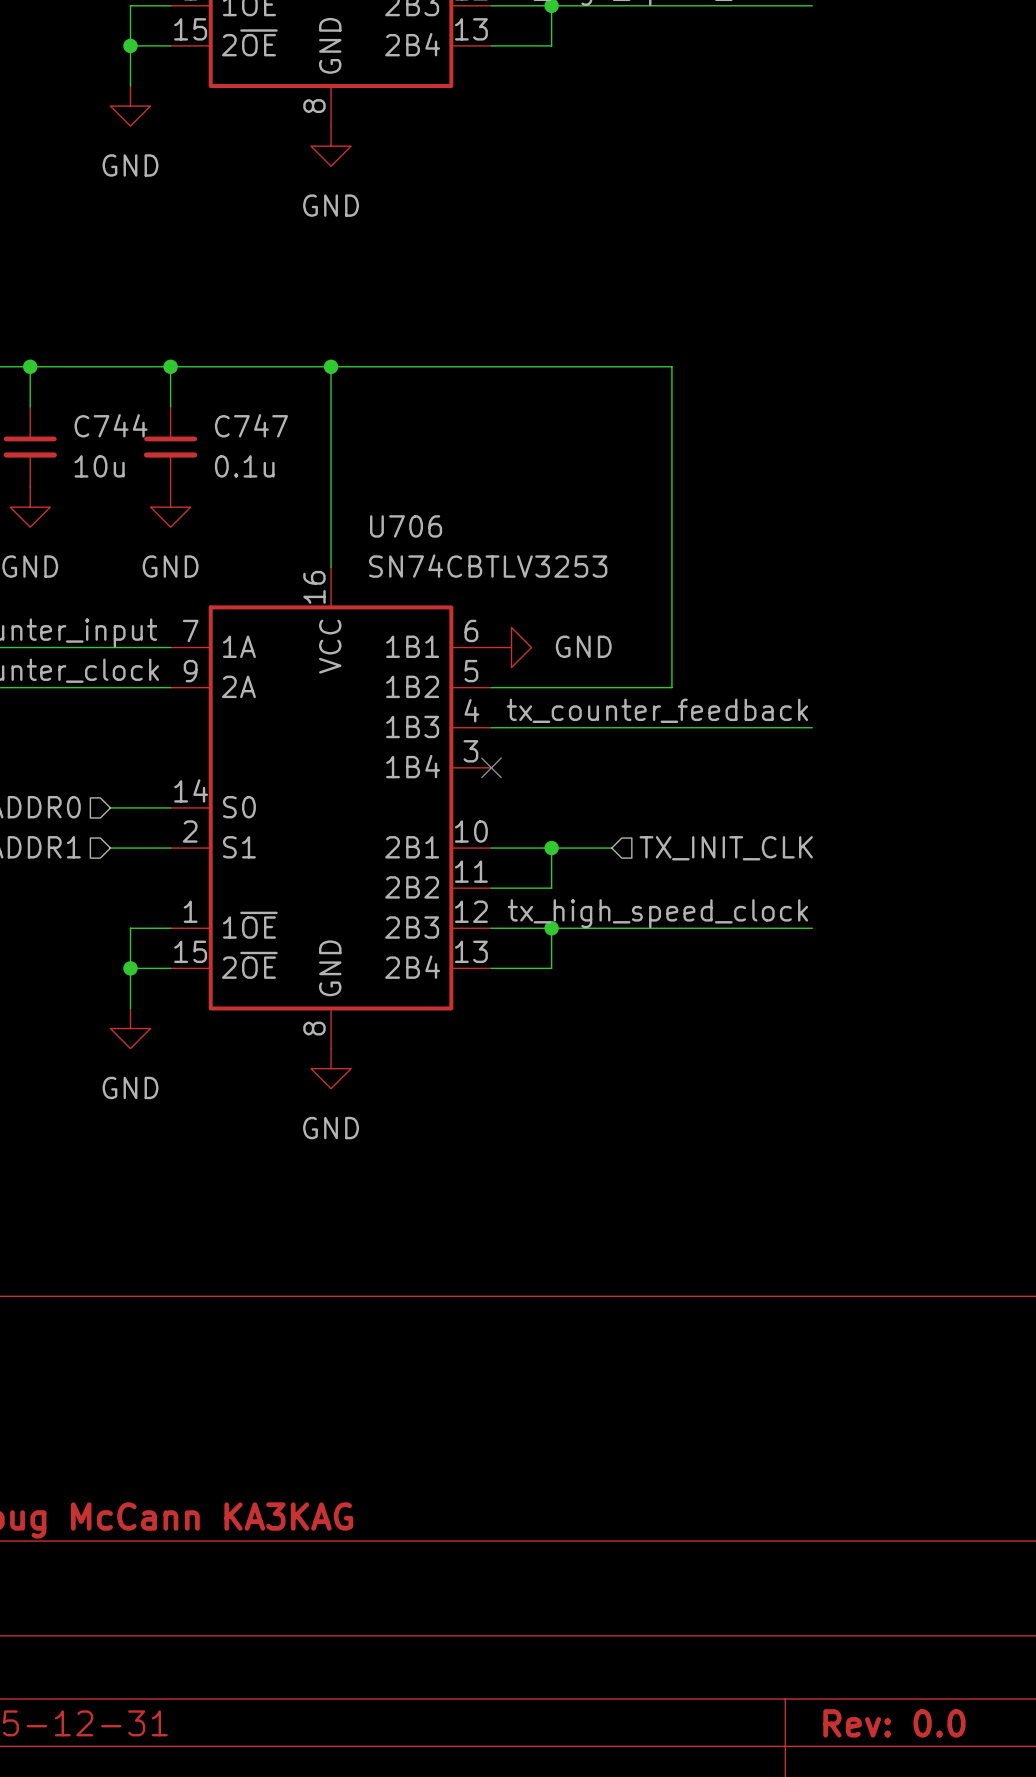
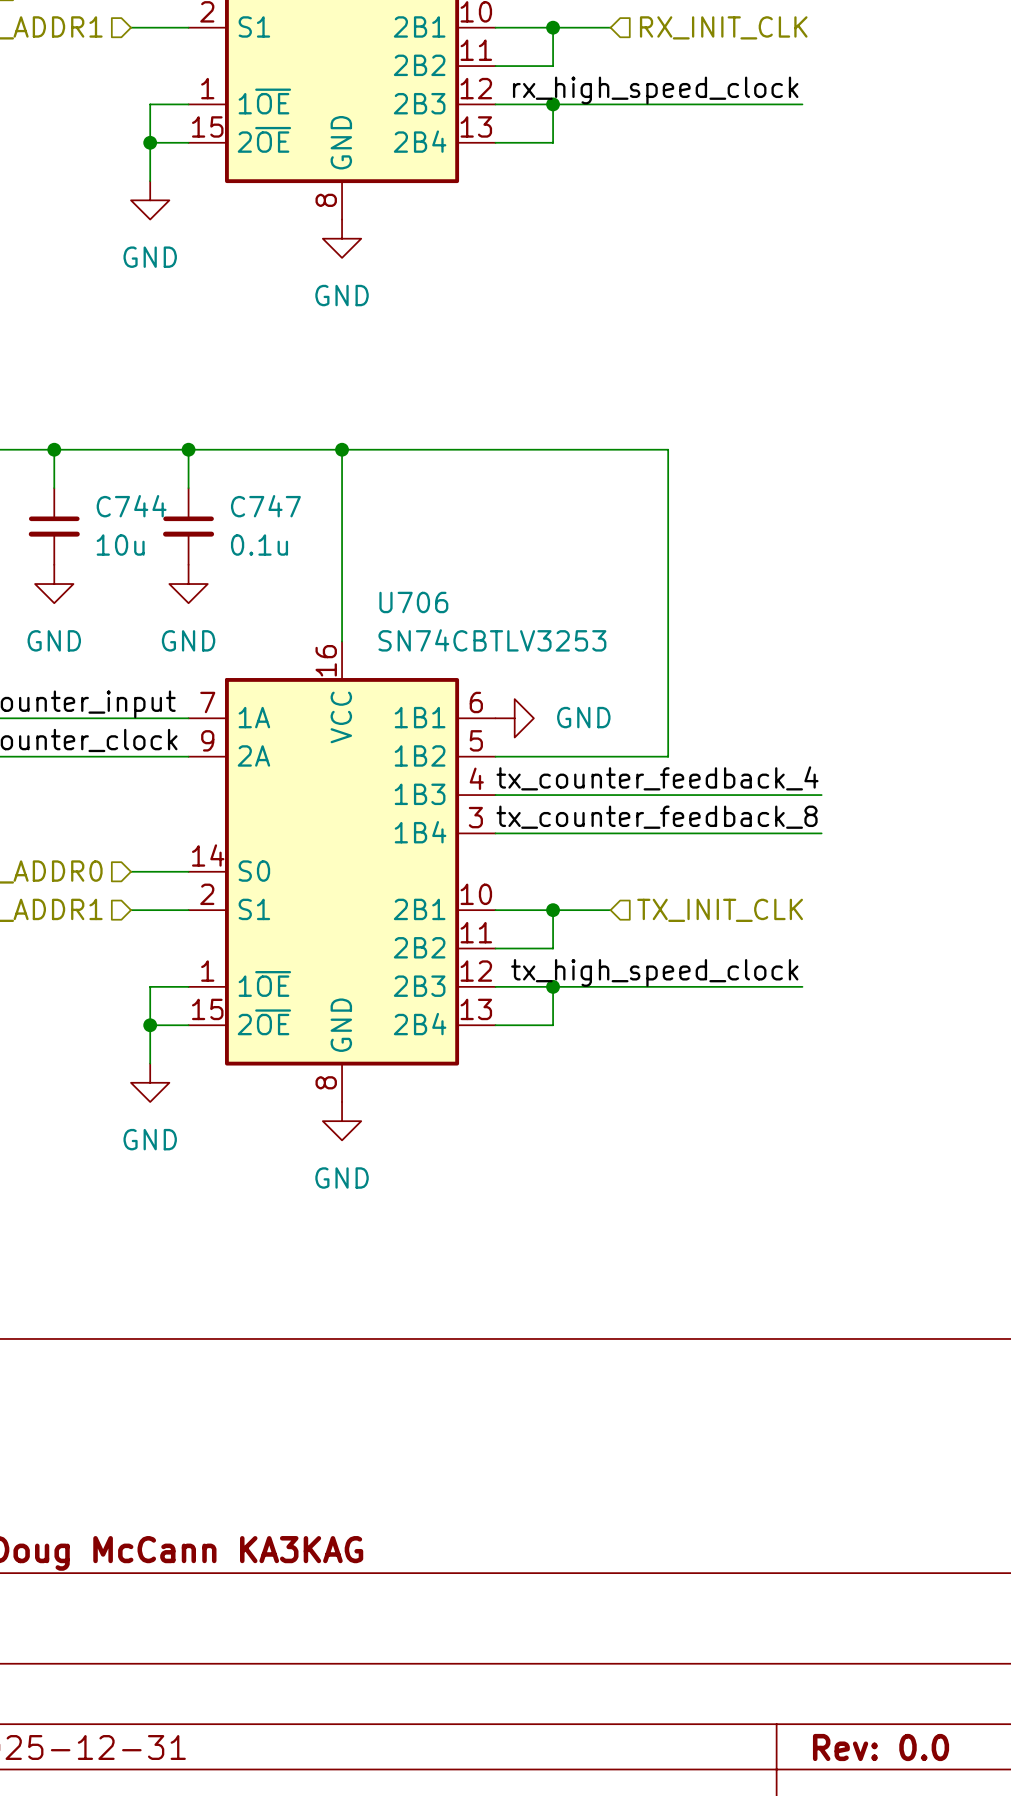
label: tx_counter_feedback (657, 710) -> tx_counter_feedback_4 (657, 778)
wire: none -> (802, 795) (821, 795)
label: none -> tx_counter_feedback_8 (657, 817)
wire: none -> (495, 833) (821, 833)
no-connect mark: (491, 767) -> none

